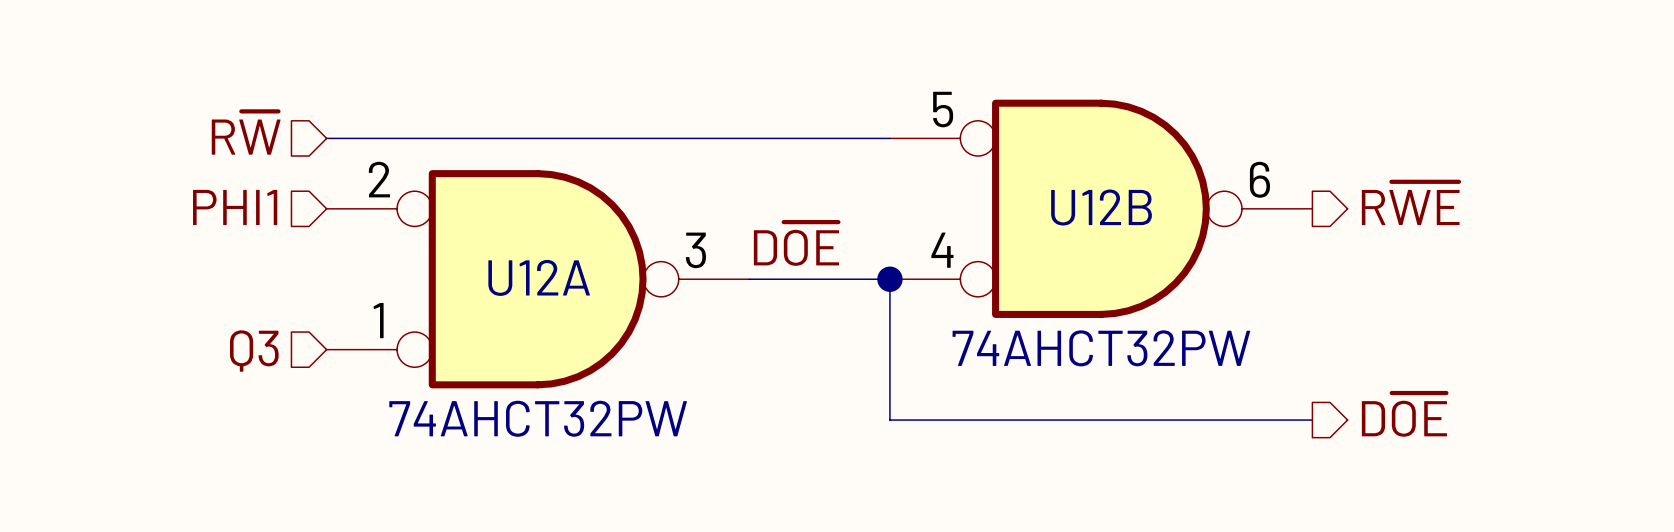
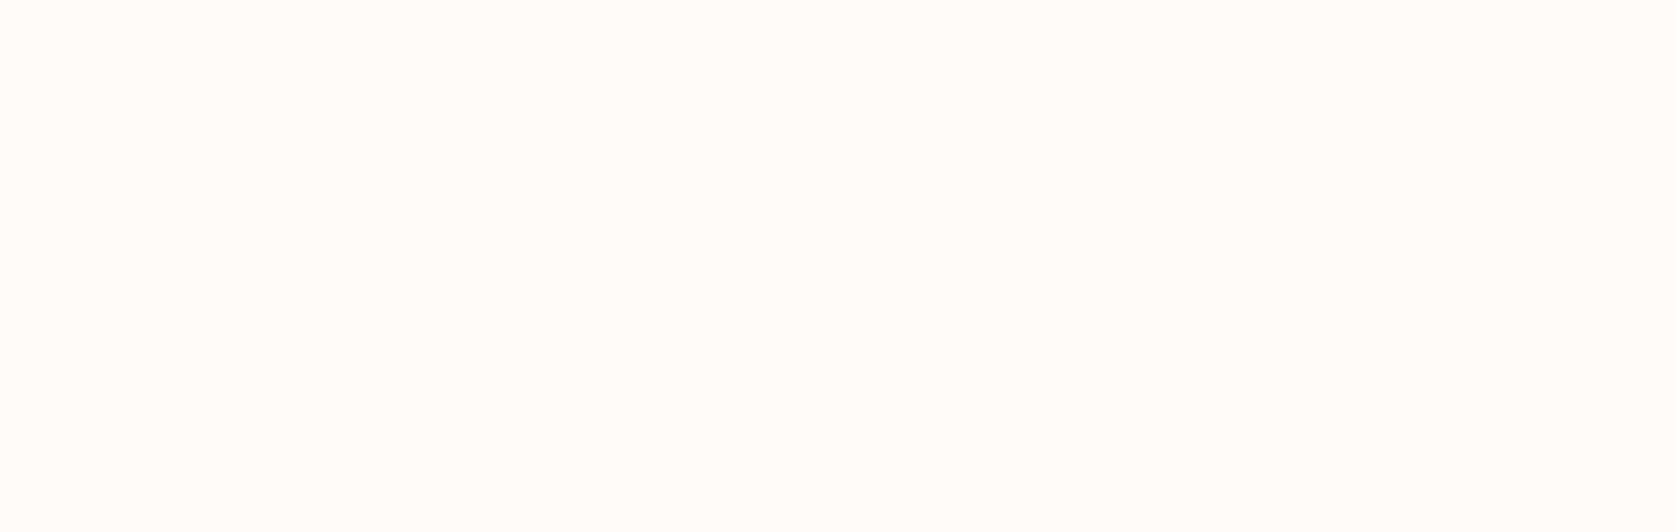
hierarchical label: R~{W} (246, 133) -> none
wire: (326, 138) (889, 138) -> none
hierarchical label: R~{WE} (1410, 203) -> none
hierarchical label: PHI1 (235, 207) -> none
U12B: 74AHCT32PW (1101, 208) -> none
label: D~{OE} (796, 243) -> none
U12A: 74AHCT32PW (537, 279) -> none
wire: (749, 279) (889, 279) (889, 420) (1312, 420) -> none
junction: (889, 279) -> none
hierarchical label: Q3 (254, 351) -> none
hierarchical label: D~{OE} (1404, 414) -> none

